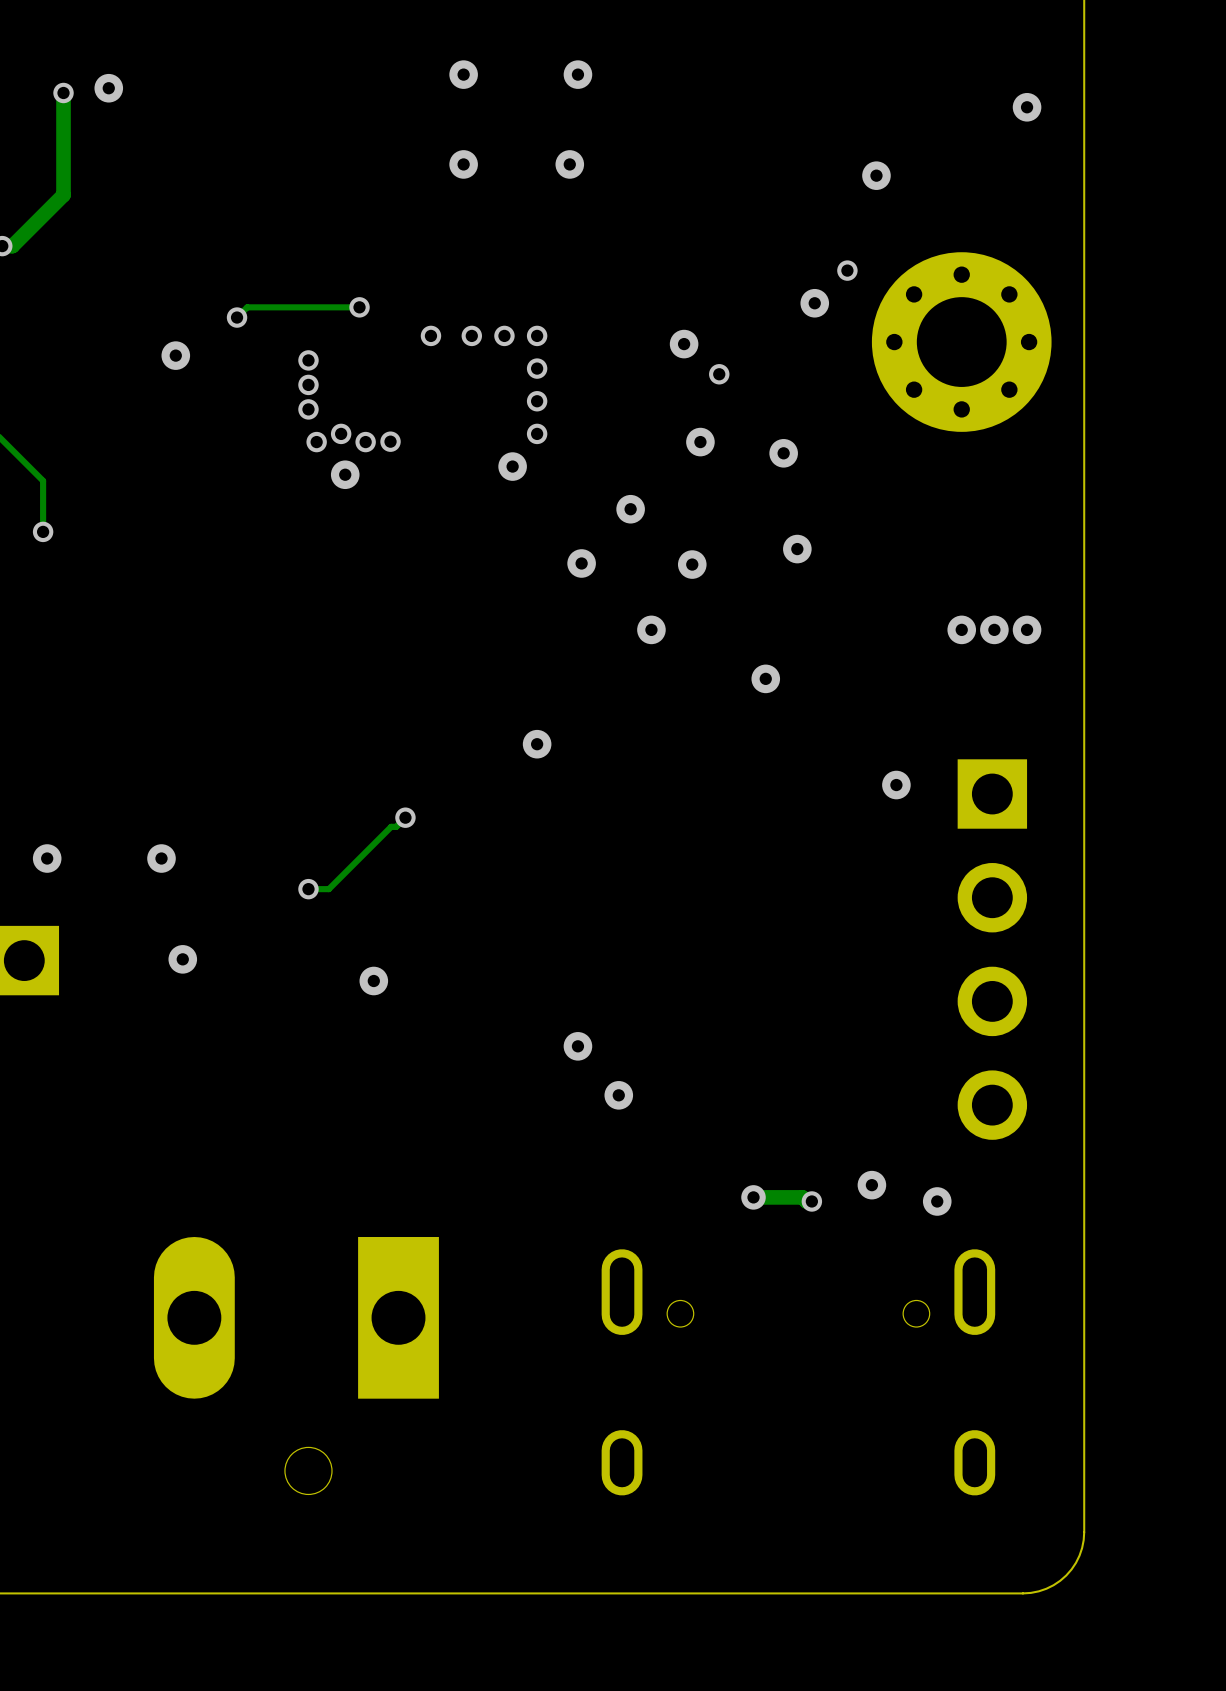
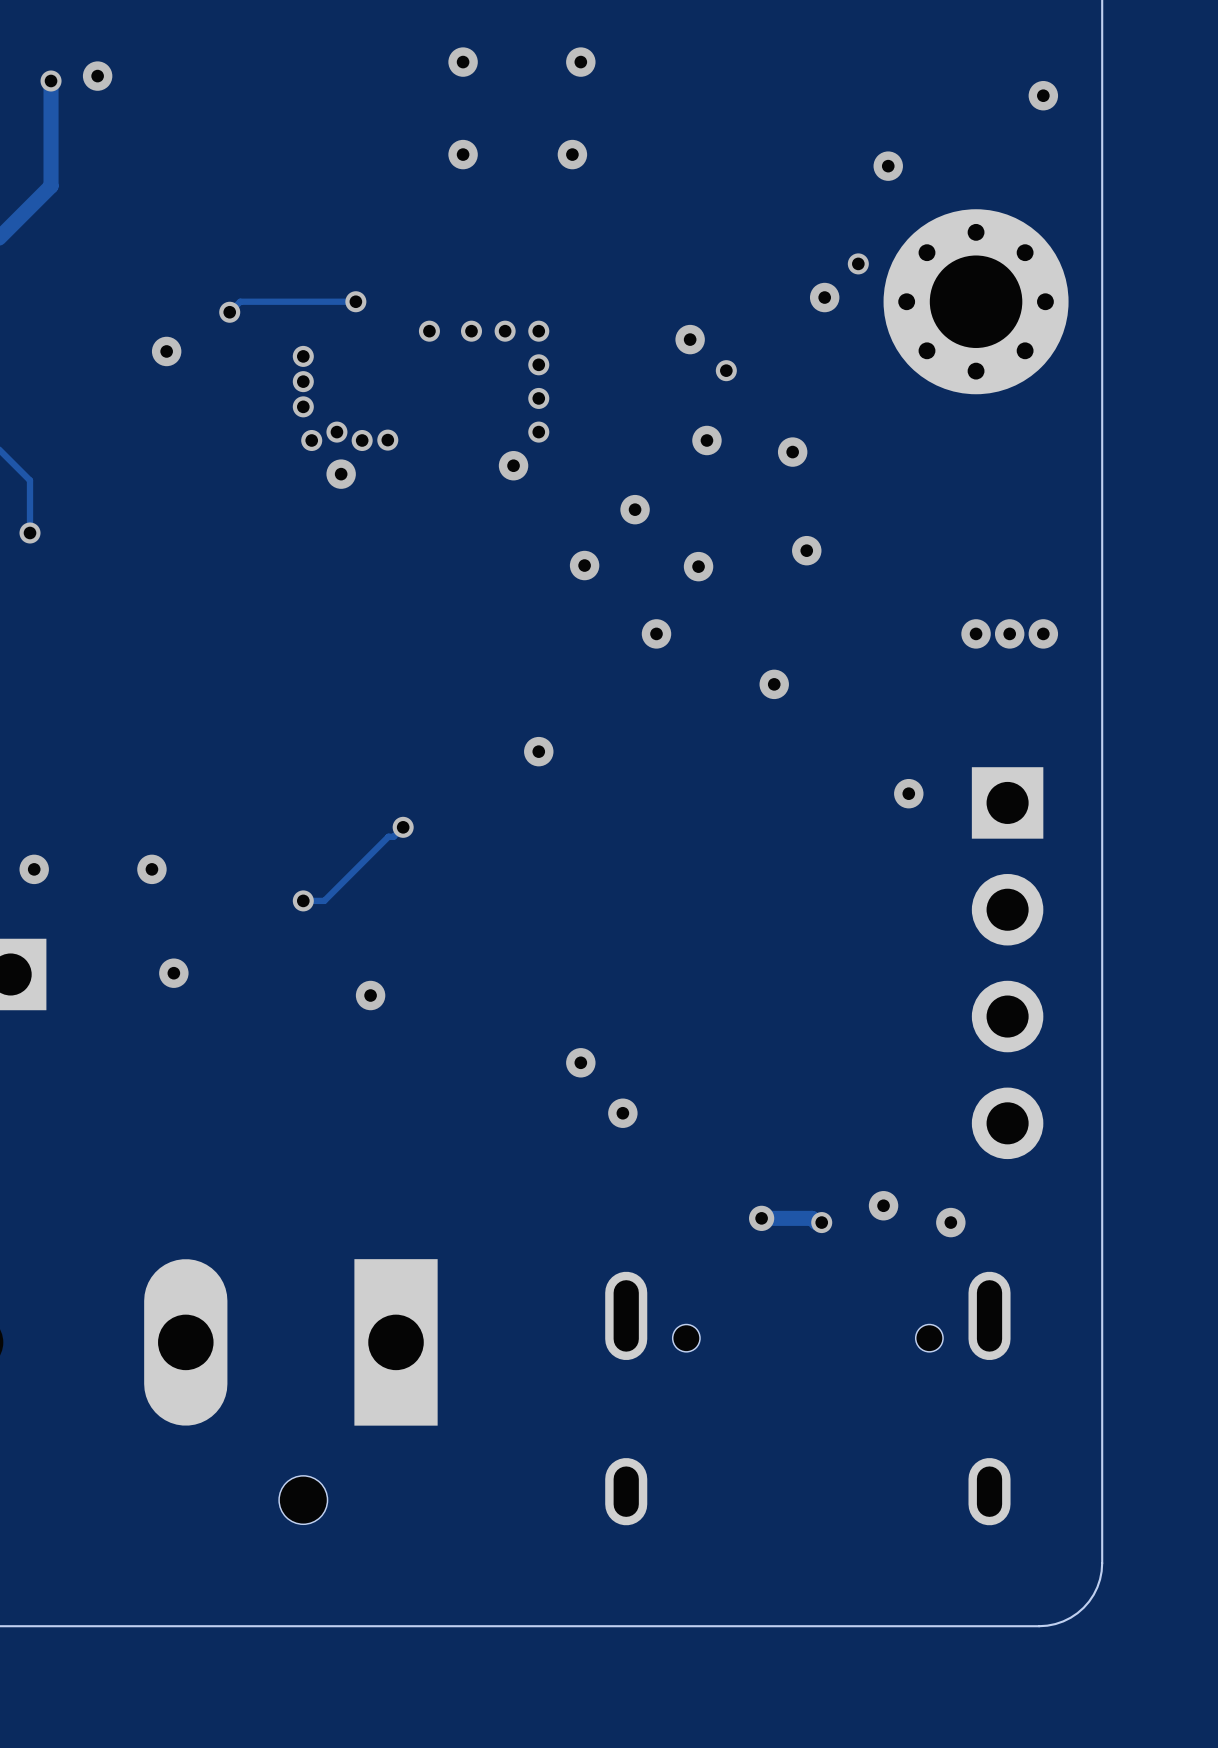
part position: (961, 342) -> (976, 301)

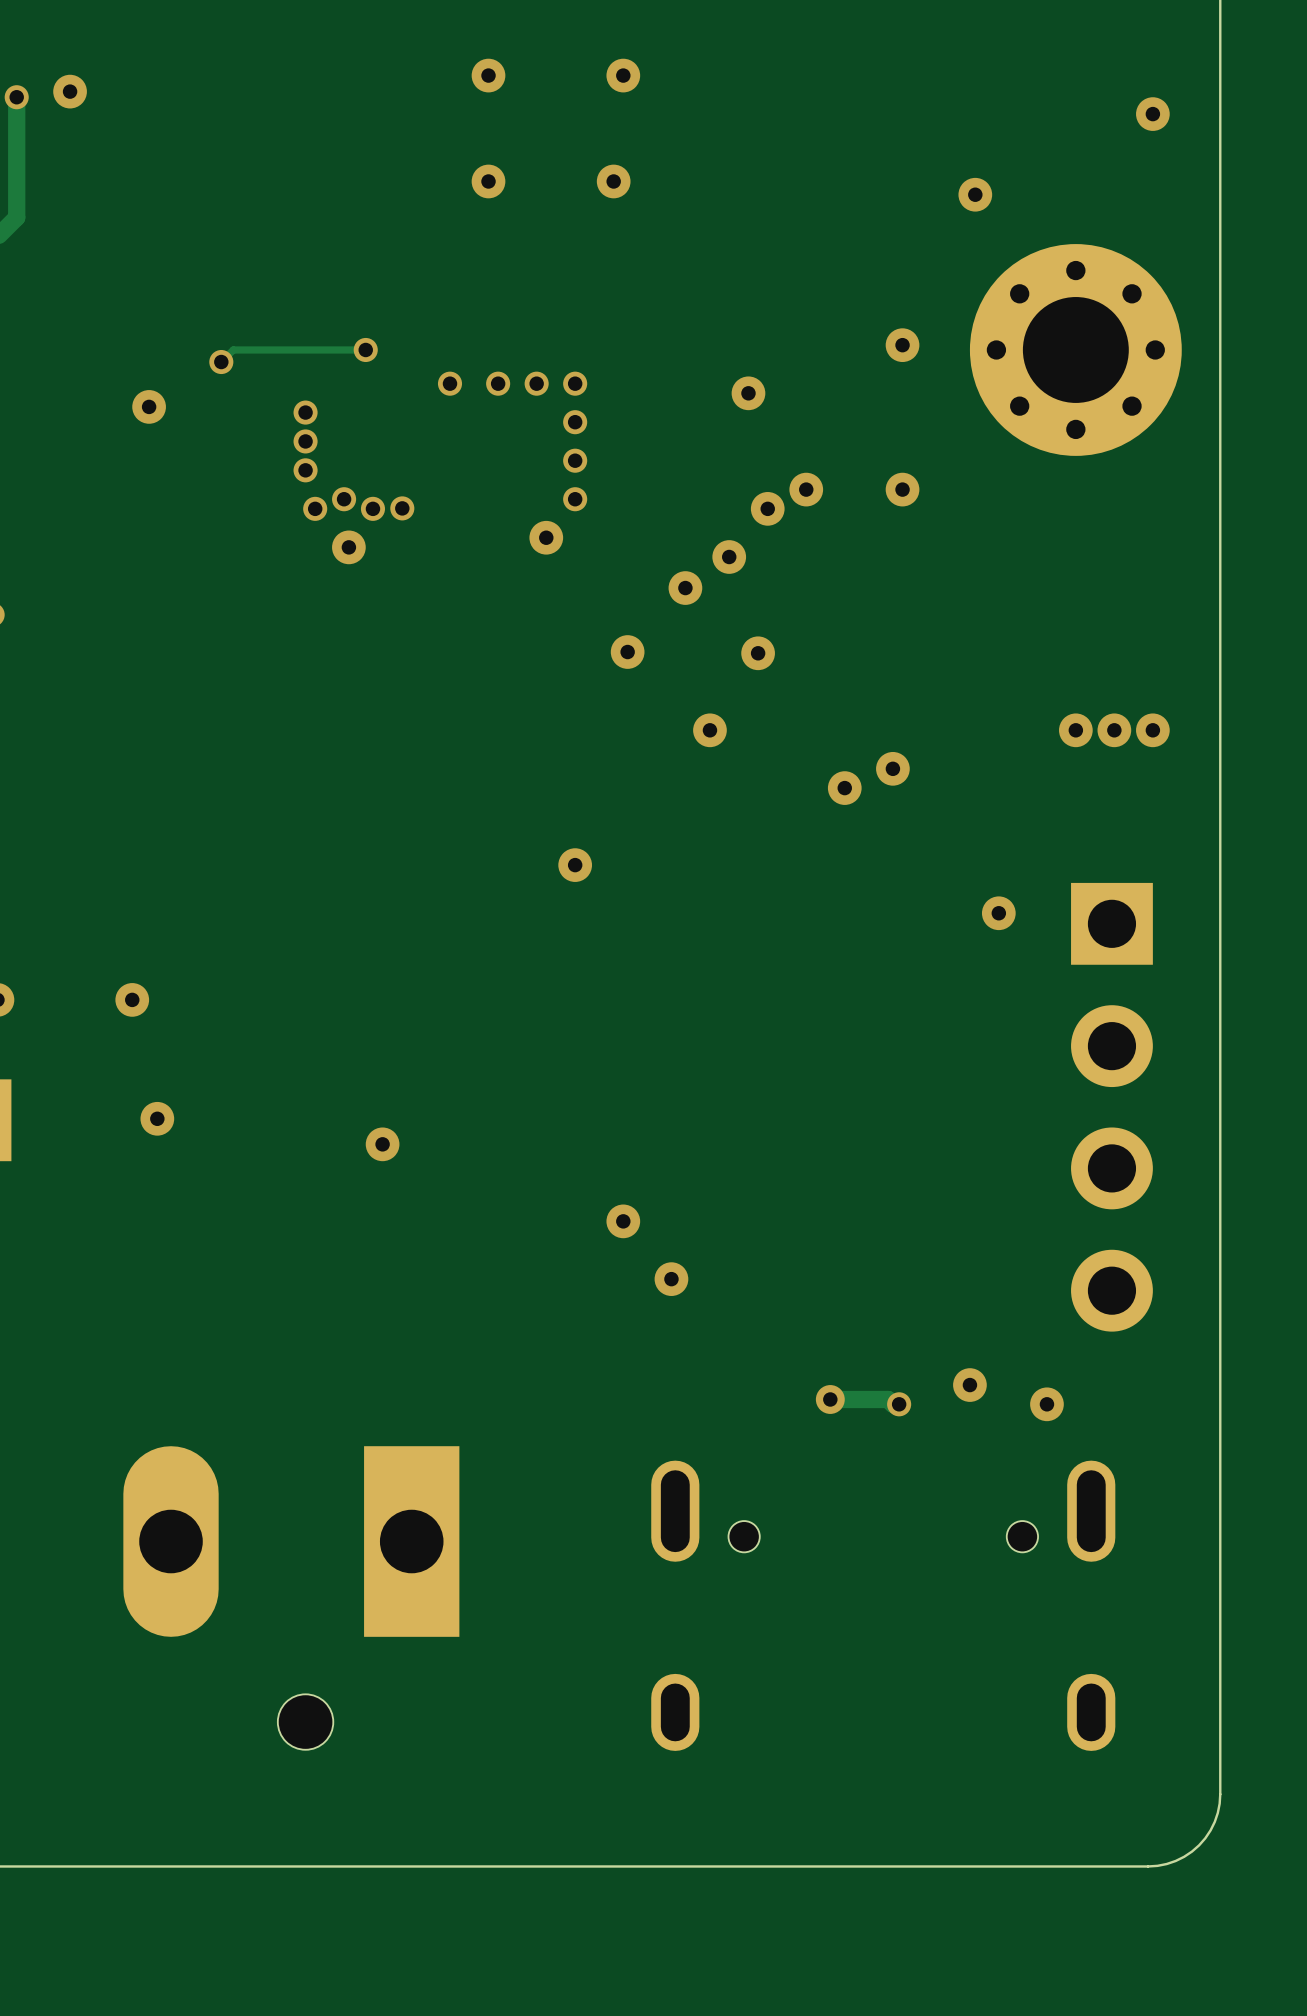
via: (858, 263) -> none
via: (726, 370) -> none
via: none -> (806, 489)
via: none -> (902, 489)
via: (792, 452) -> none
via: none -> (729, 556)
via: (806, 550) -> none
via: none -> (892, 768)
track: (403, 827) (393, 836) (388, 836) (324, 900) (303, 900) -> none
via: (403, 827) -> none
via: (303, 900) -> none

